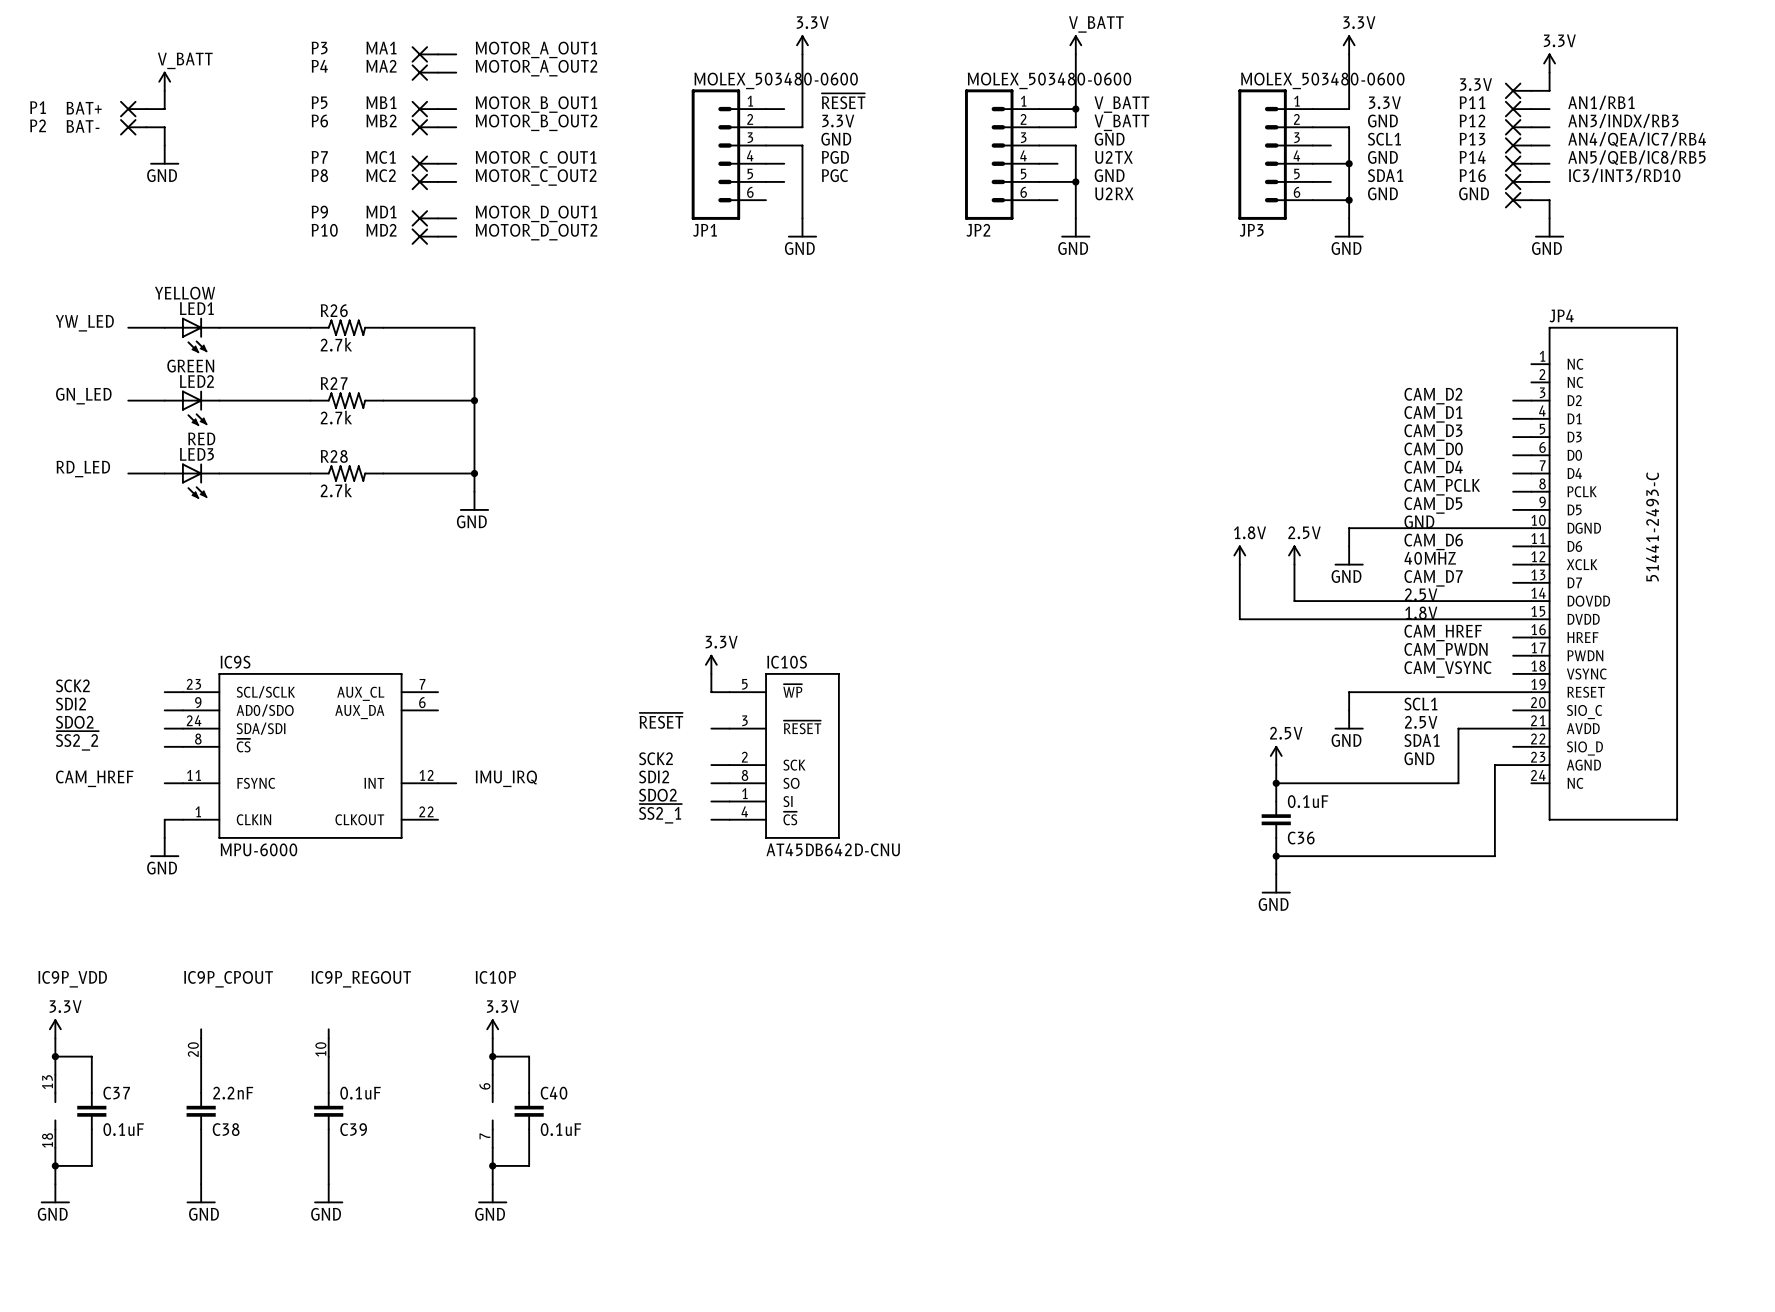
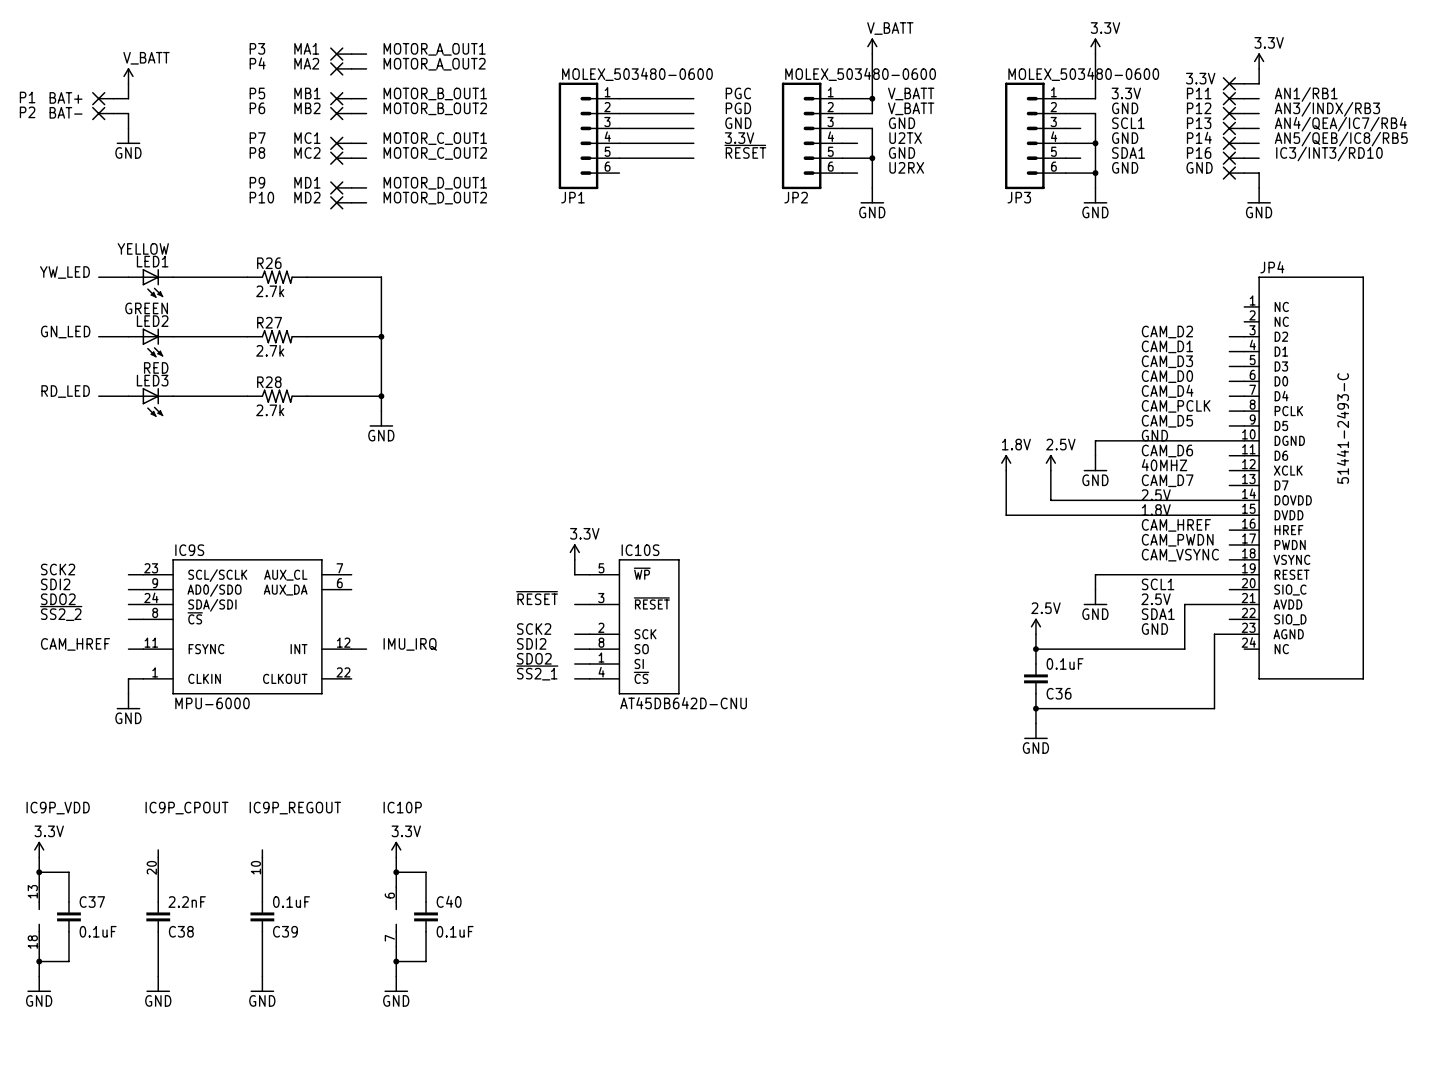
power symbol: 3.3V (802, 44) -> none
wire: (802, 54) (802, 127) -> (693, 113) (649, 113)
label position: ~{RESET} (843, 101) -> ~{RESET} (745, 151)
wire: none -> (634, 98) (693, 98)
label position: 3.3V (838, 121) -> 3.3V (739, 138)
label position: GND (836, 139) -> GND (738, 123)
wire: (802, 145) (802, 218) -> (649, 128) (693, 128)
label position: PGD (835, 157) -> PGD (738, 108)
wire: none -> (634, 143) (693, 143)
label position: PGC (834, 175) -> PGC (738, 93)
wire: none -> (634, 158) (693, 158)
power symbol: GND (802, 227) -> none

